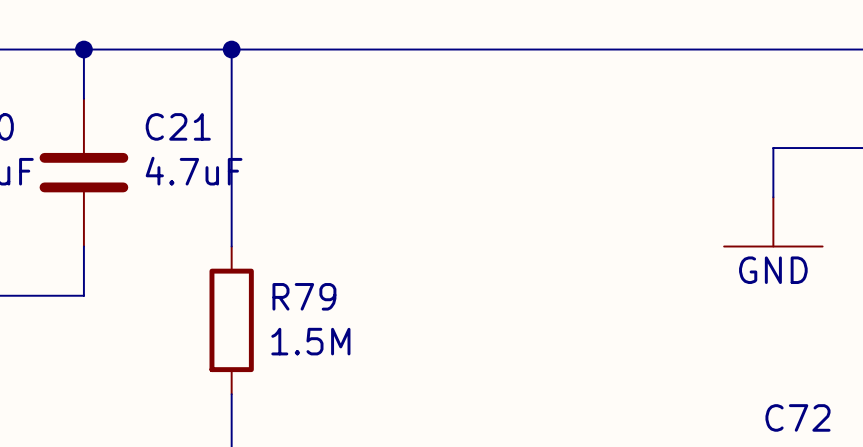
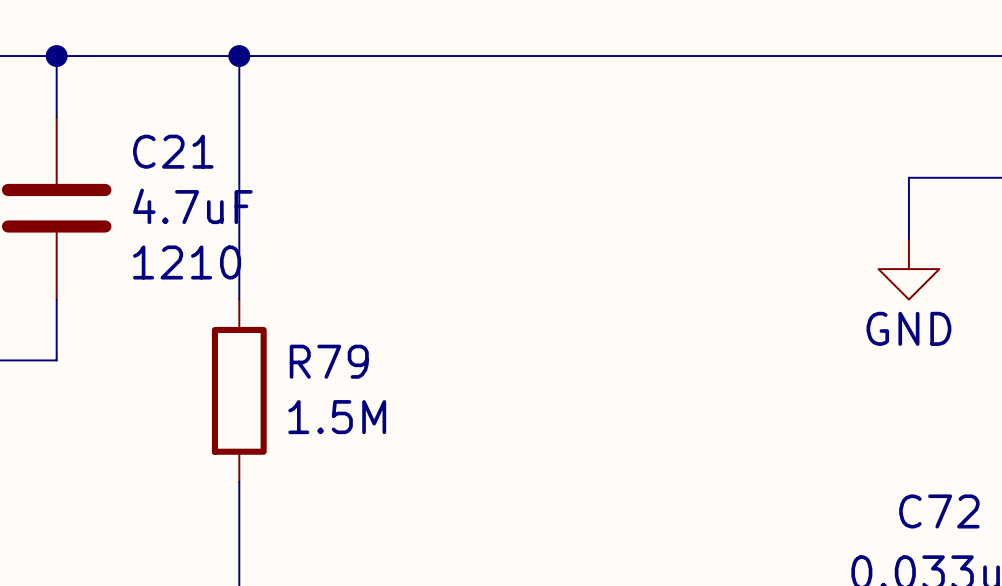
power symbol shape: [724, 197, 823, 247] -> [878, 238, 940, 300]
C21 text: none -> 1210 (187, 262)

